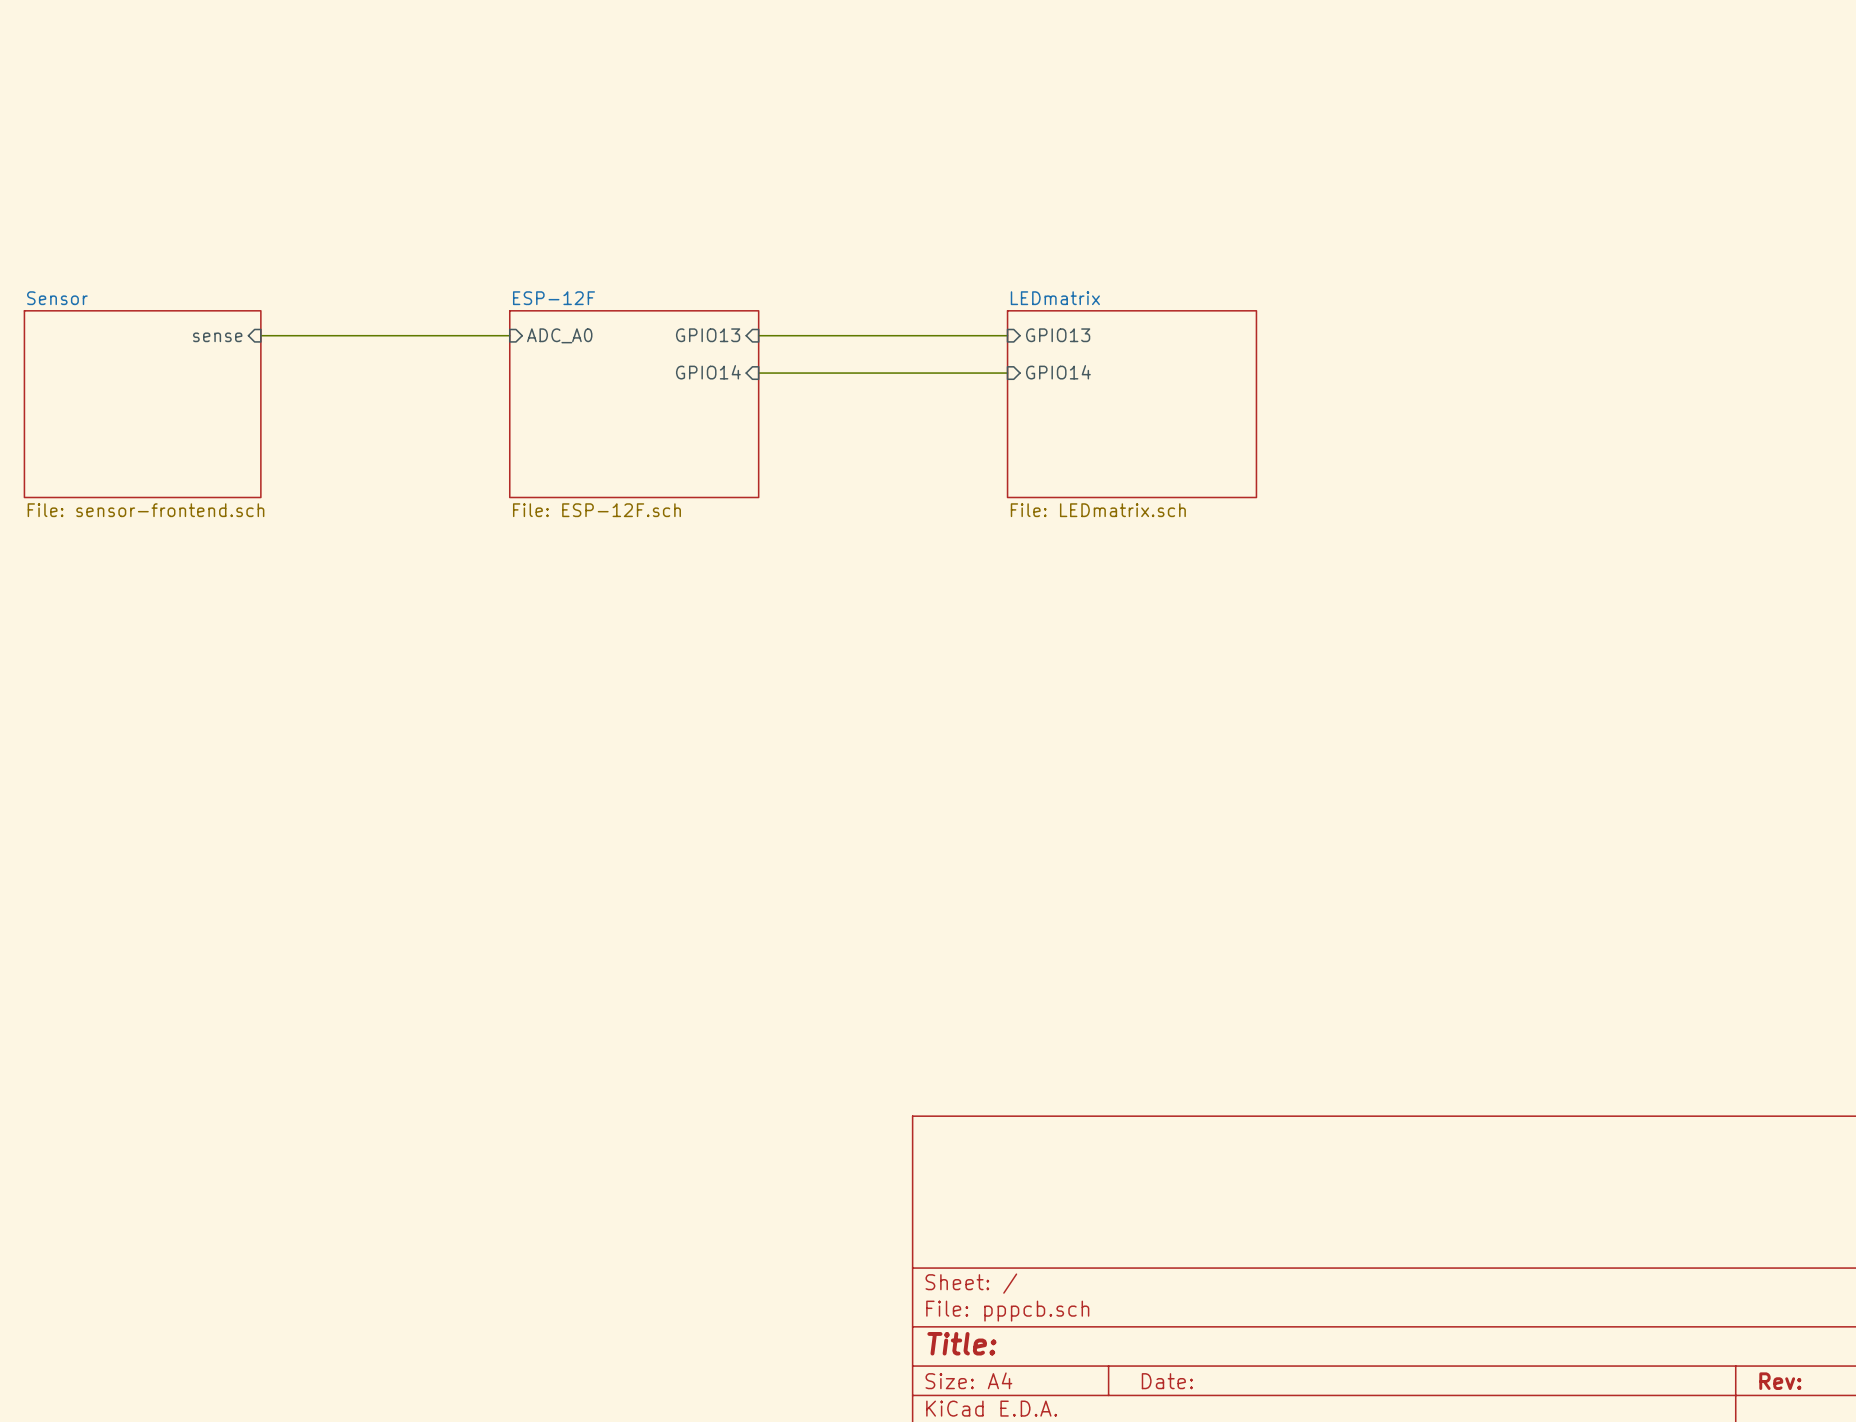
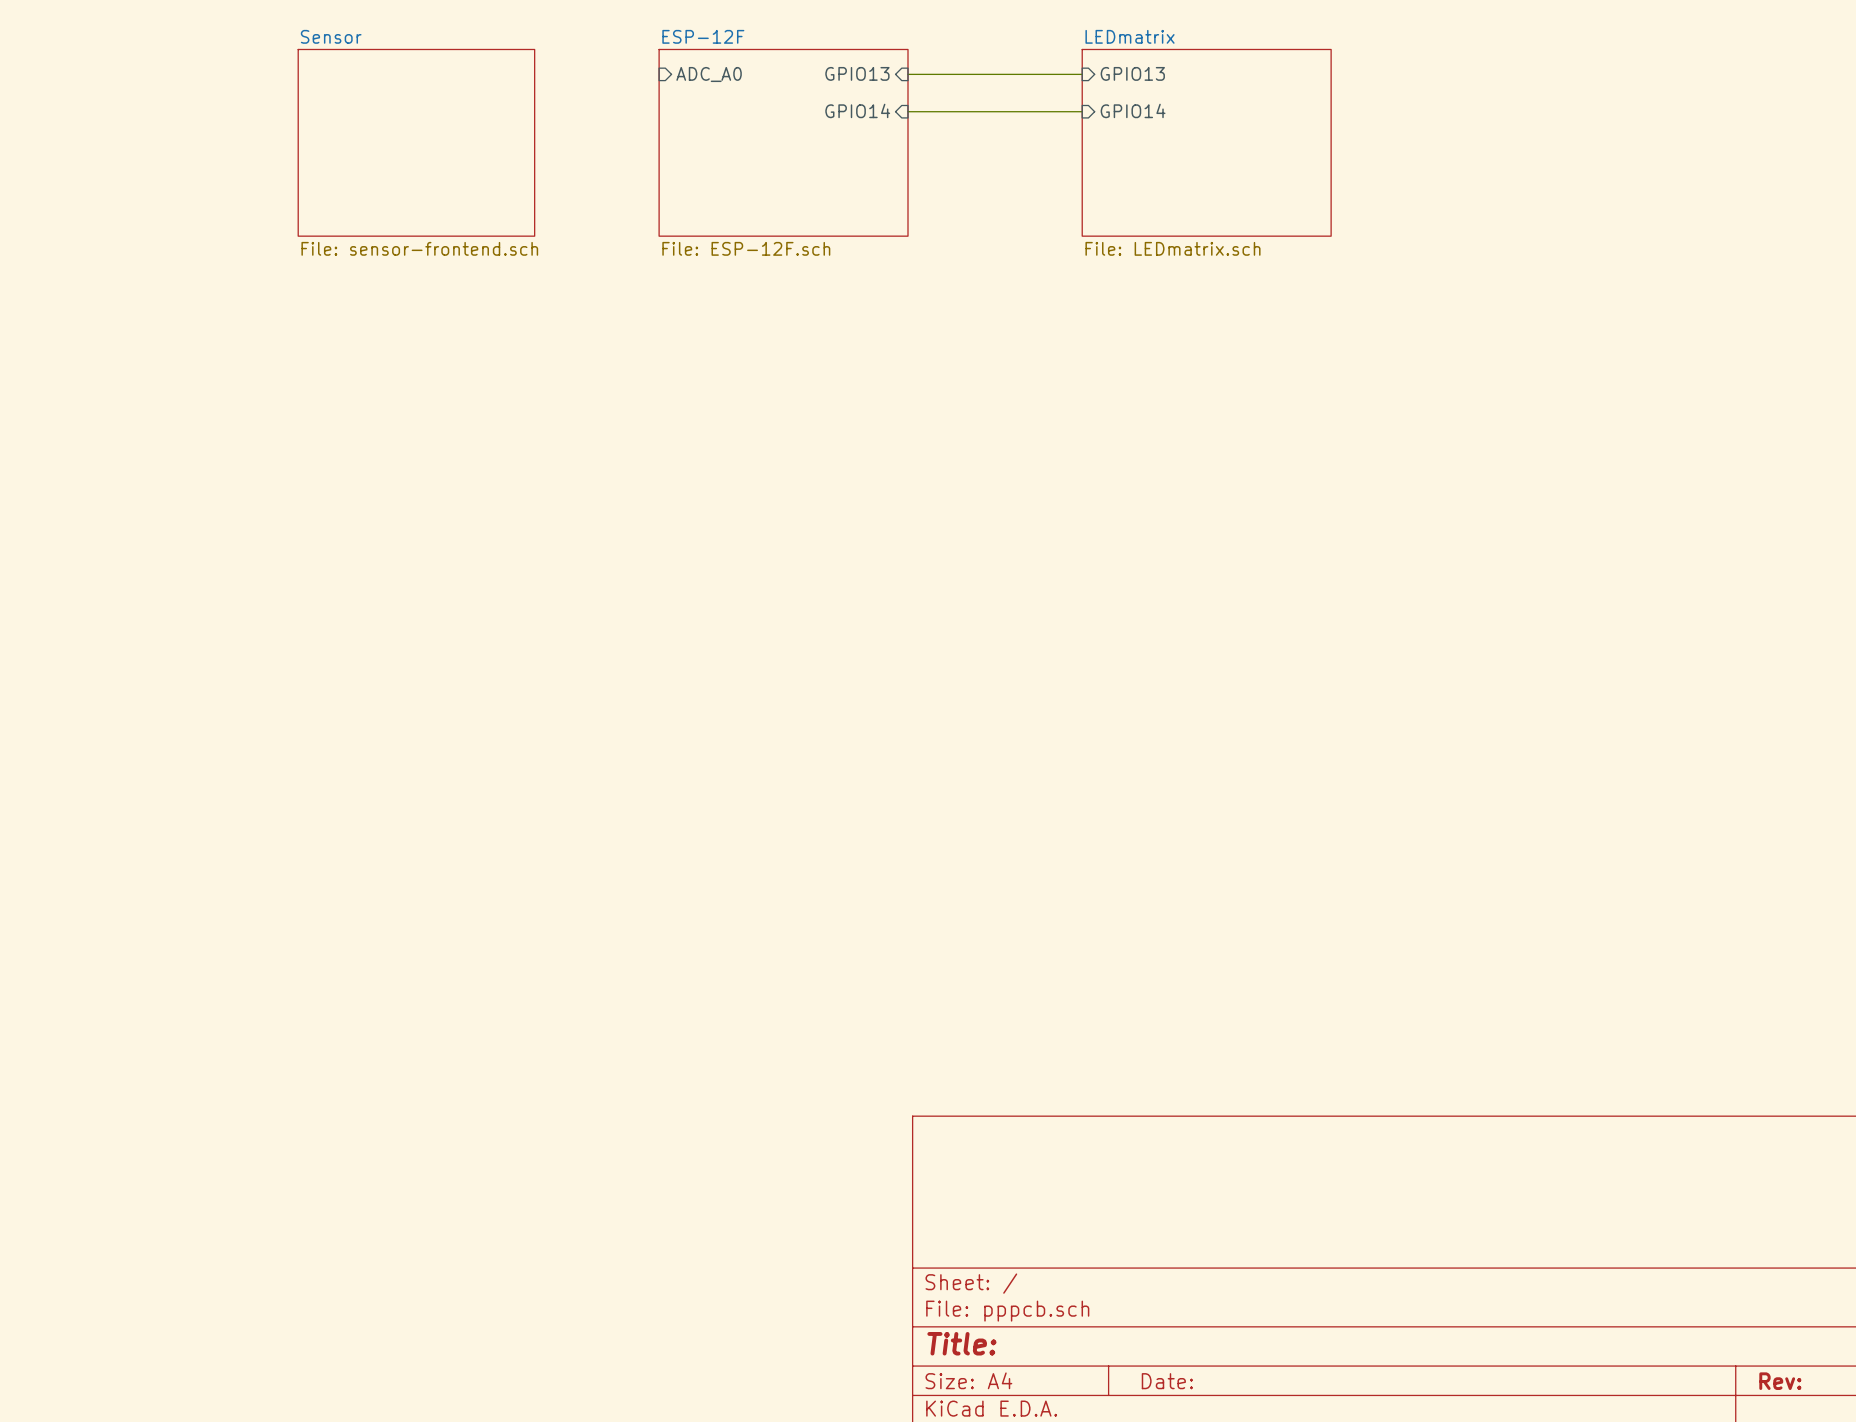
sheet pin: none -> GPIO13 (857, 73)
sheet pin: none -> GPIO13 (1132, 73)
sheet pin: none -> ADC_A0 (709, 74)
wire: none -> (907, 74) (1082, 74)
sheet pin: none -> GPIO14 (857, 110)
sheet pin: none -> GPIO14 (1133, 110)
wire: none -> (907, 111) (1082, 111)
sheet Sensor: none -> File: sensor-frontend.sch (416, 142)
sheet LEDmatrix: none -> File: LEDmatrix.sch (1206, 142)
wire: (260, 335) (509, 335) -> none
sheet pin: ADC_A0 (559, 335) -> none
sheet pin: GPIO13 (708, 335) -> none
wire: (758, 335) (1007, 335) -> none
sheet pin: GPIO13 (1058, 335) -> none
sheet pin: sense (217, 337) -> none
sheet pin: GPIO14 (708, 372) -> none
sheet pin: GPIO14 (1058, 372) -> none
wire: (758, 373) (1007, 373) -> none
sheet Sensor: File: sensor-frontend.sch (142, 404) -> none
sheet ESP-12F position: (634, 404) -> (783, 142)
sheet LEDmatrix: File: LEDmatrix.sch (1132, 404) -> none

